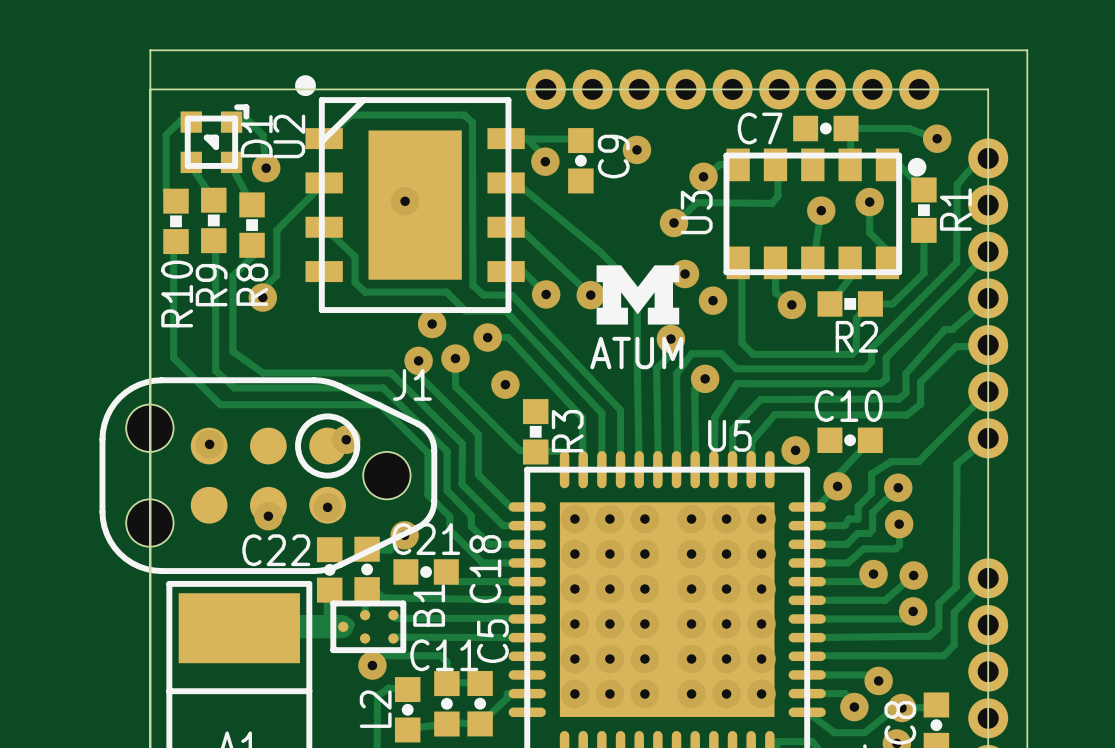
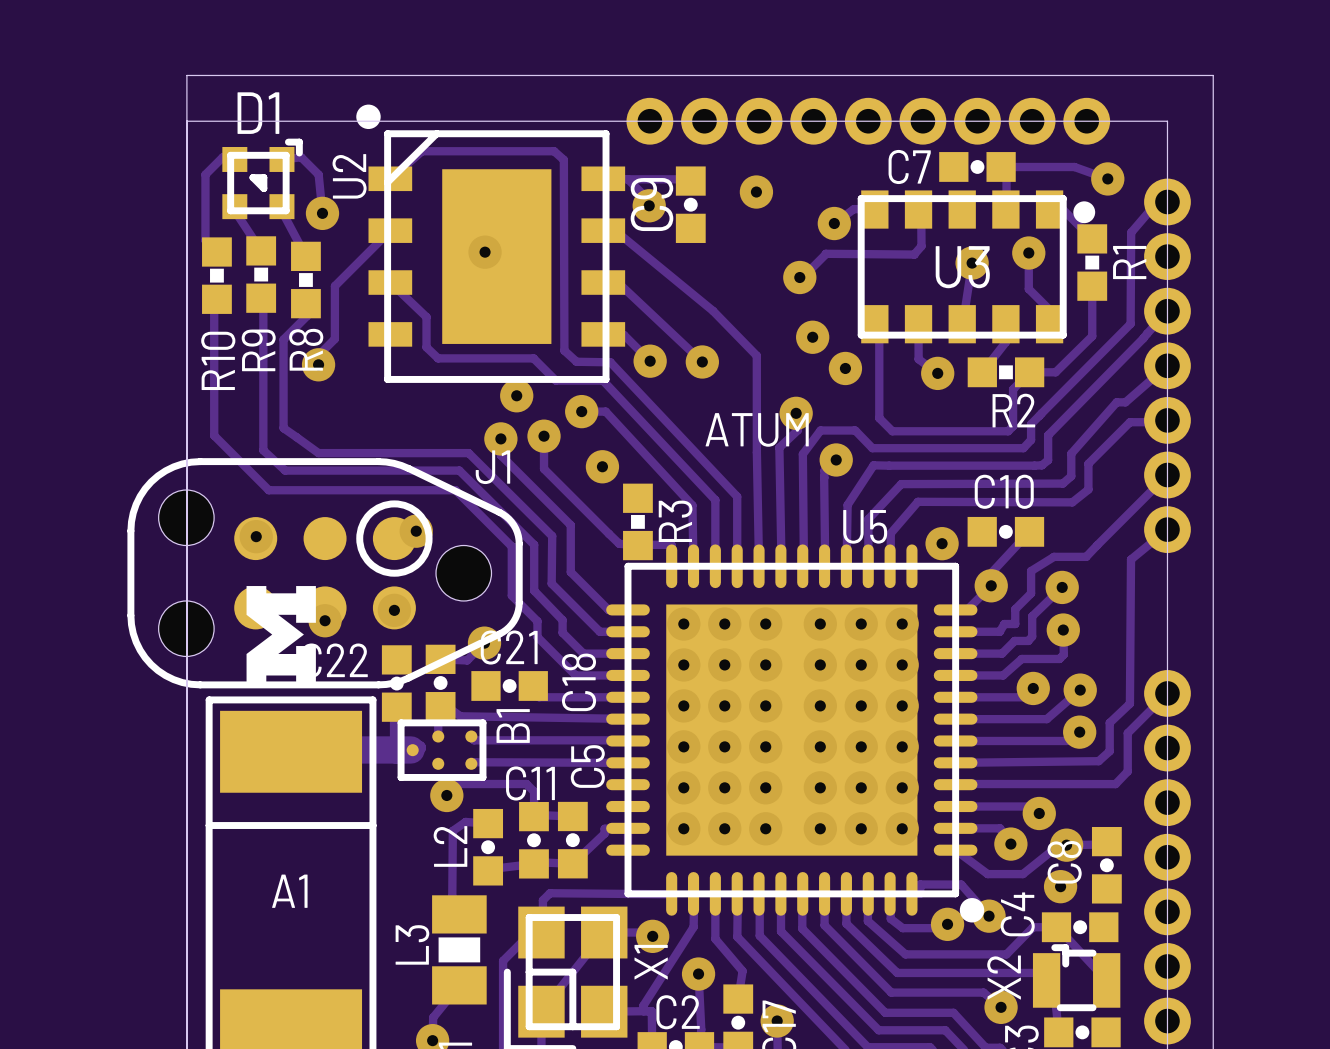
D1 name rotation: 0° (256, 136) -> 90° clockwise (258, 113)
D1 name position: D1 (256, 136) -> D1 (258, 113)
C9 name position: C9 (613, 156) -> C9 (651, 204)
U3 name rotation: 0° (696, 212) -> 90° clockwise (962, 267)
U3 name position: U3 (696, 212) -> U3 (962, 267)
drawing: [596, 265, 680, 325] -> none
drawing: none -> [246, 586, 316, 683]

